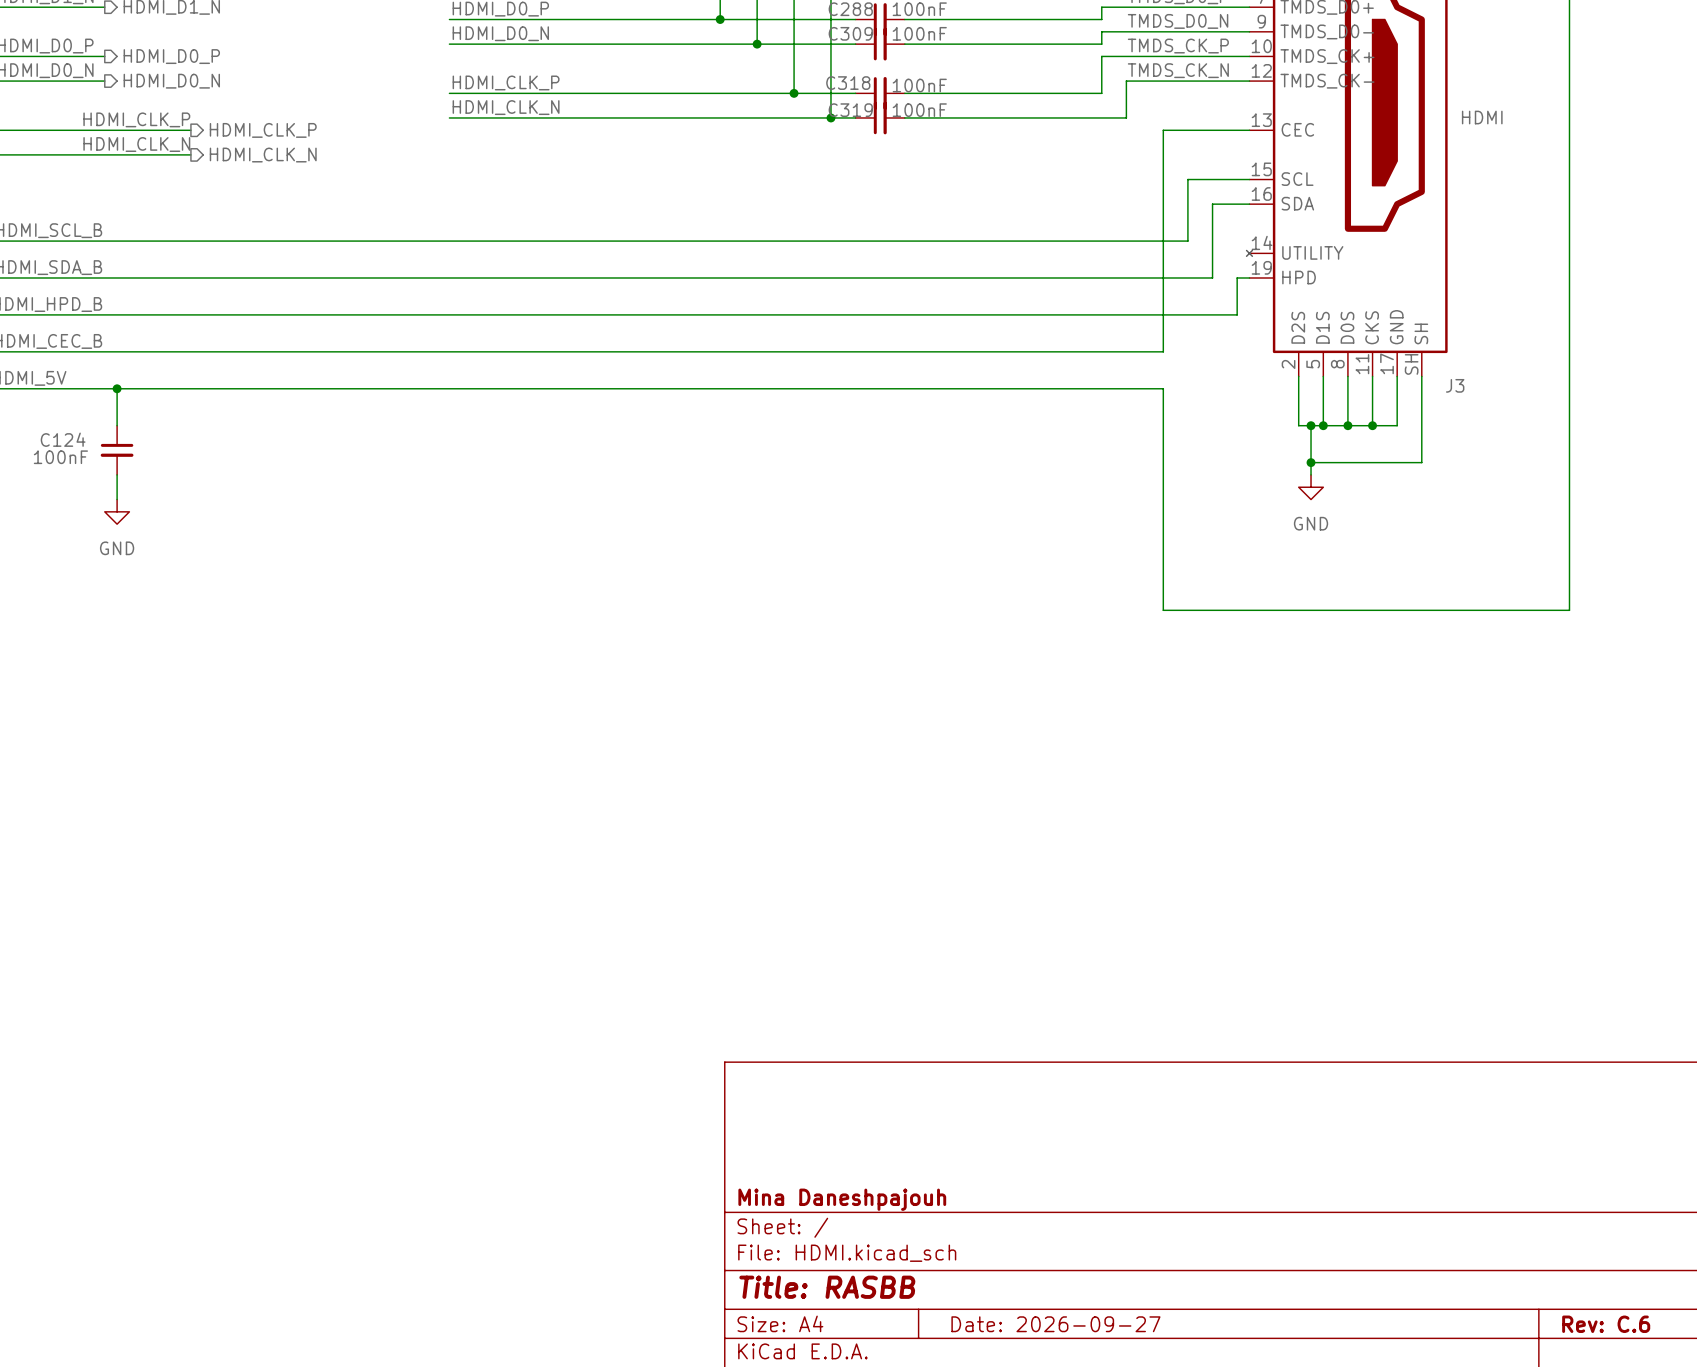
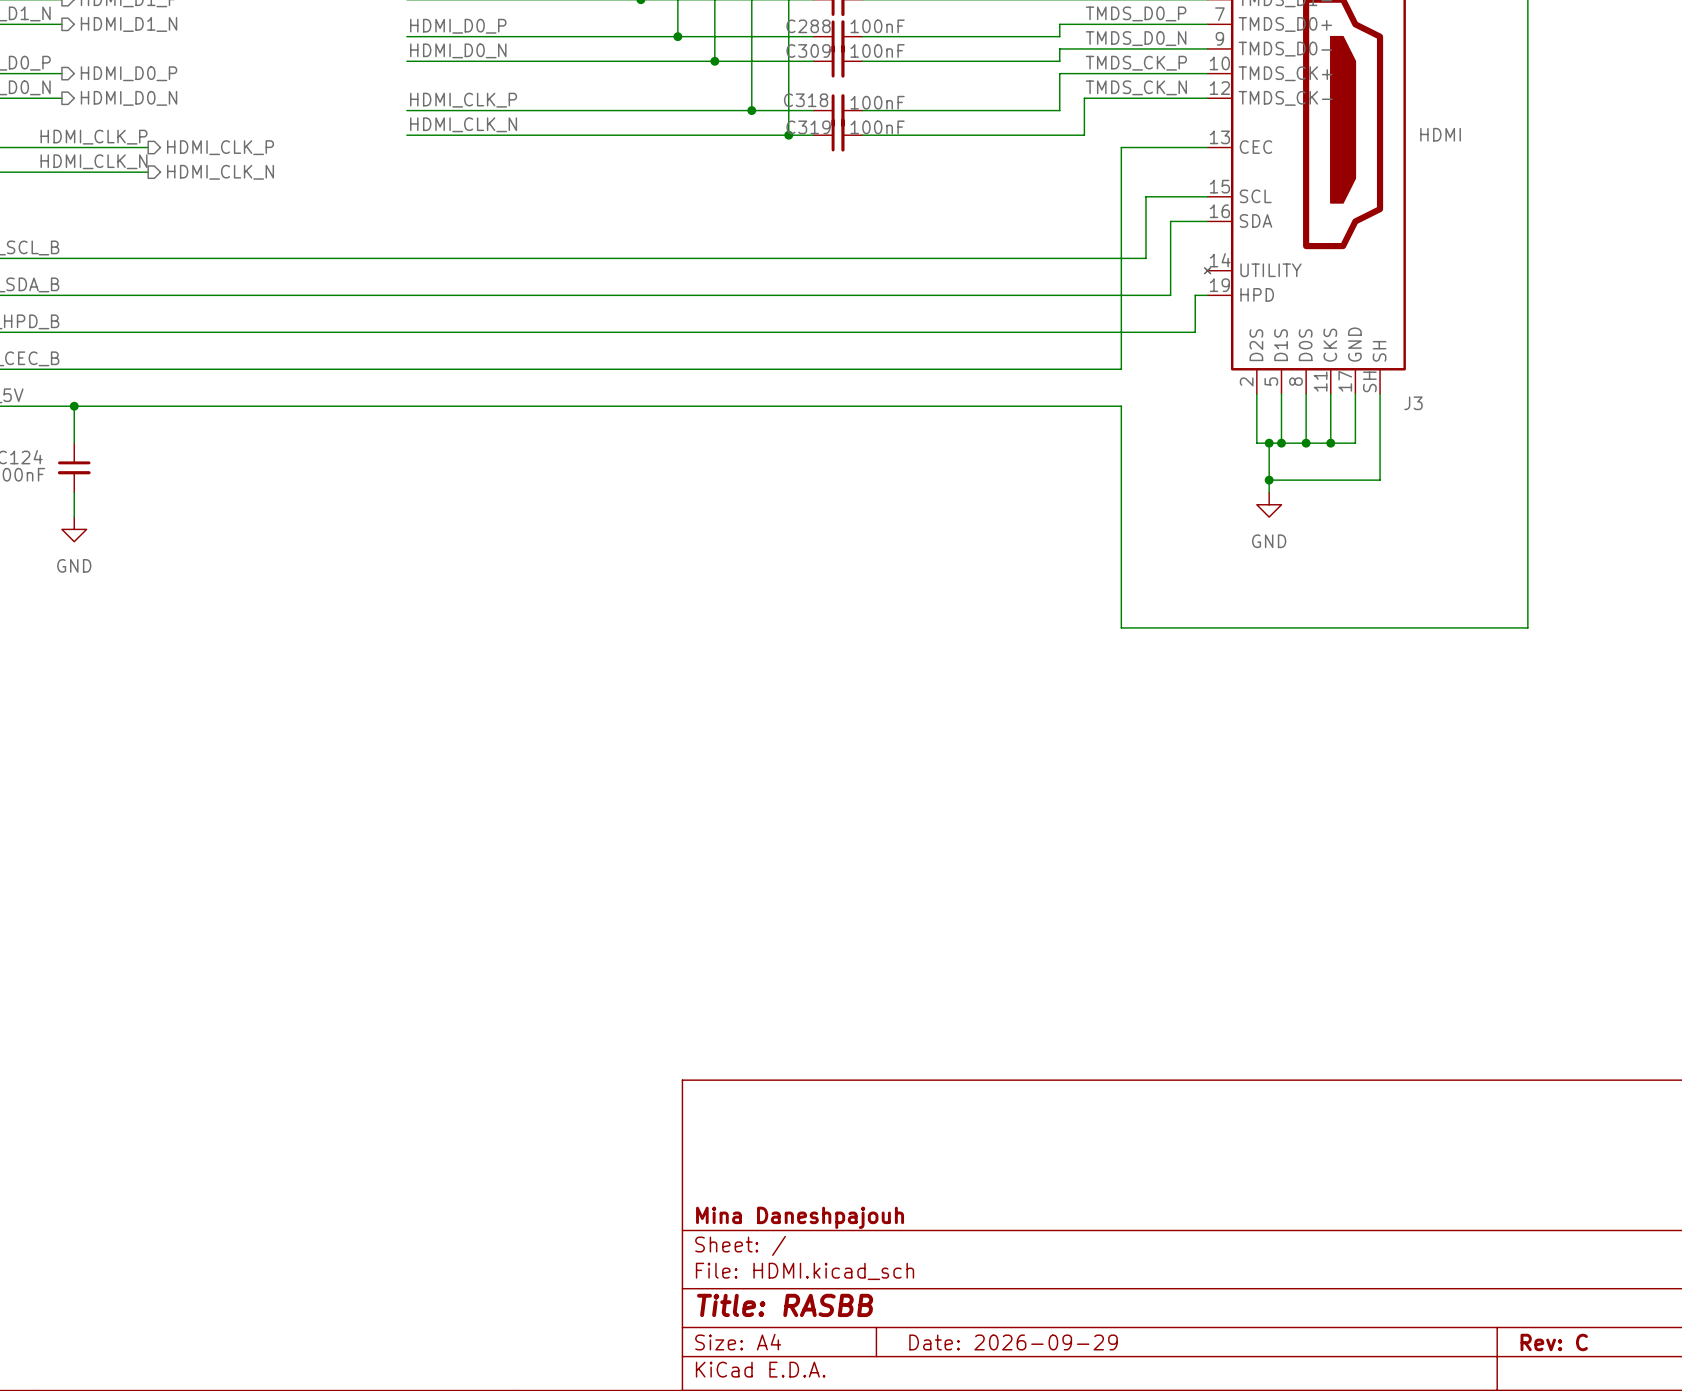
title block: Date: 2026-09-27 (1055, 1324) -> Date: 2026-09-29 (1013, 1342)
title block: Rev: C.6 (1606, 1324) -> Rev: C (1554, 1342)

